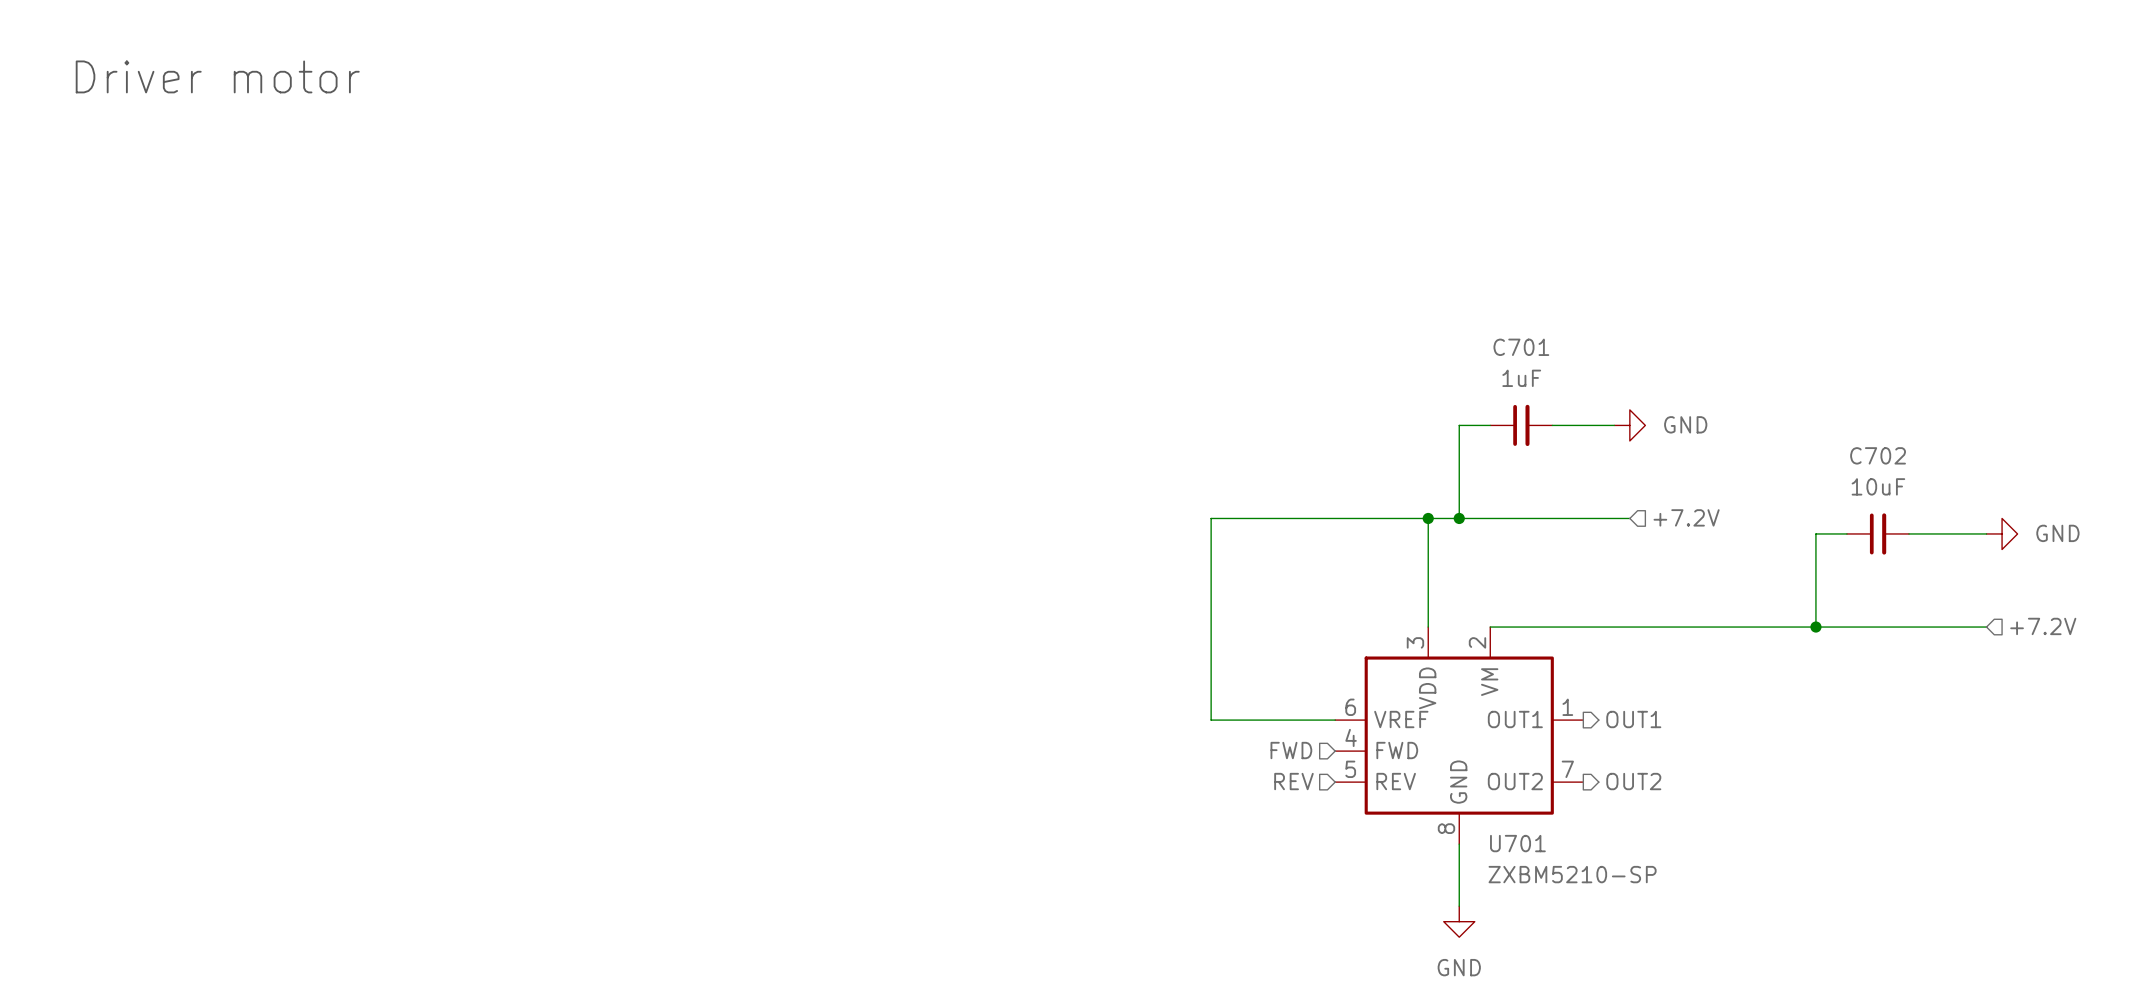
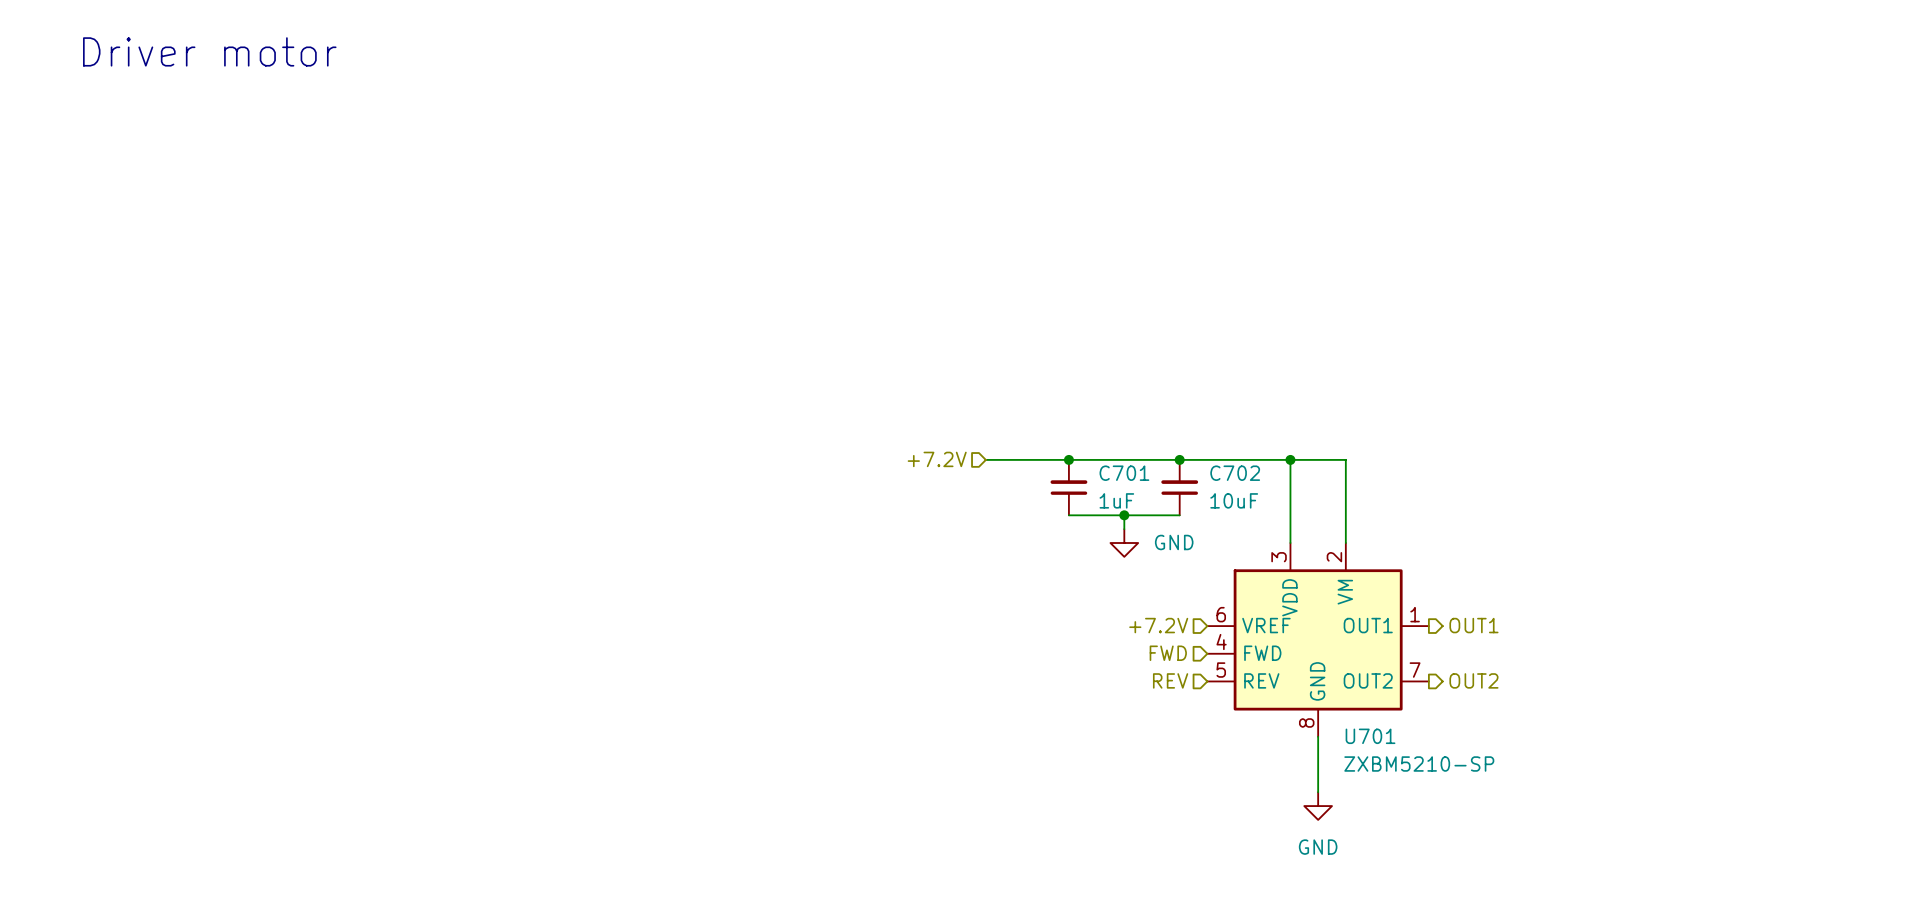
C701 name position: C701 (1521, 347) -> C701 (1124, 473)
C701 value position: 1uF (1521, 378) -> 1uF (1116, 500)
wire: (1490, 425) (1459, 425) (1459, 518) -> none
C701 rotation: 0° (1521, 425) -> 90° counterclockwise (1068, 487)
C701 position: (1521, 425) -> (1068, 487)
wire: (1552, 425) (1614, 425) -> none
power symbol: GND (1629, 425) -> none
C702 name position: C702 (1878, 455) -> C702 (1235, 473)
C702 value position: 10uF (1878, 486) -> 10uF (1234, 500)
hierarchical label: +7.2V (1686, 517) -> none
wire: (1428, 518) (1428, 533) -> (1124, 515) (1124, 529)
junction position: (1428, 518) -> (1290, 459)
junction: (1459, 518) -> none
wire: (1629, 518) (1211, 518) (1211, 720) (1335, 720) -> none
hierarchical label: none -> +7.2V (937, 459)
junction: none -> (1068, 459)
junction: none -> (1179, 459)
wire: (1846, 533) (1815, 533) (1815, 627) -> none
C702 position: (1877, 533) -> (1179, 487)
C702 rotation: 0° (1878, 533) -> 90° counterclockwise (1179, 487)
wire: (1909, 533) (1986, 533) -> none
power symbol: GND (2002, 533) -> none
wire: none -> (1068, 515) (1179, 515)
junction: none -> (1124, 515)
hierarchical label: +7.2V (2043, 626) -> none
power symbol: none -> GND (1124, 543)
wire: (1490, 627) (1986, 627) -> (1345, 543) (1345, 459) (985, 459)
junction: (1815, 627) -> none
hierarchical label: none -> +7.2V (1158, 625)

